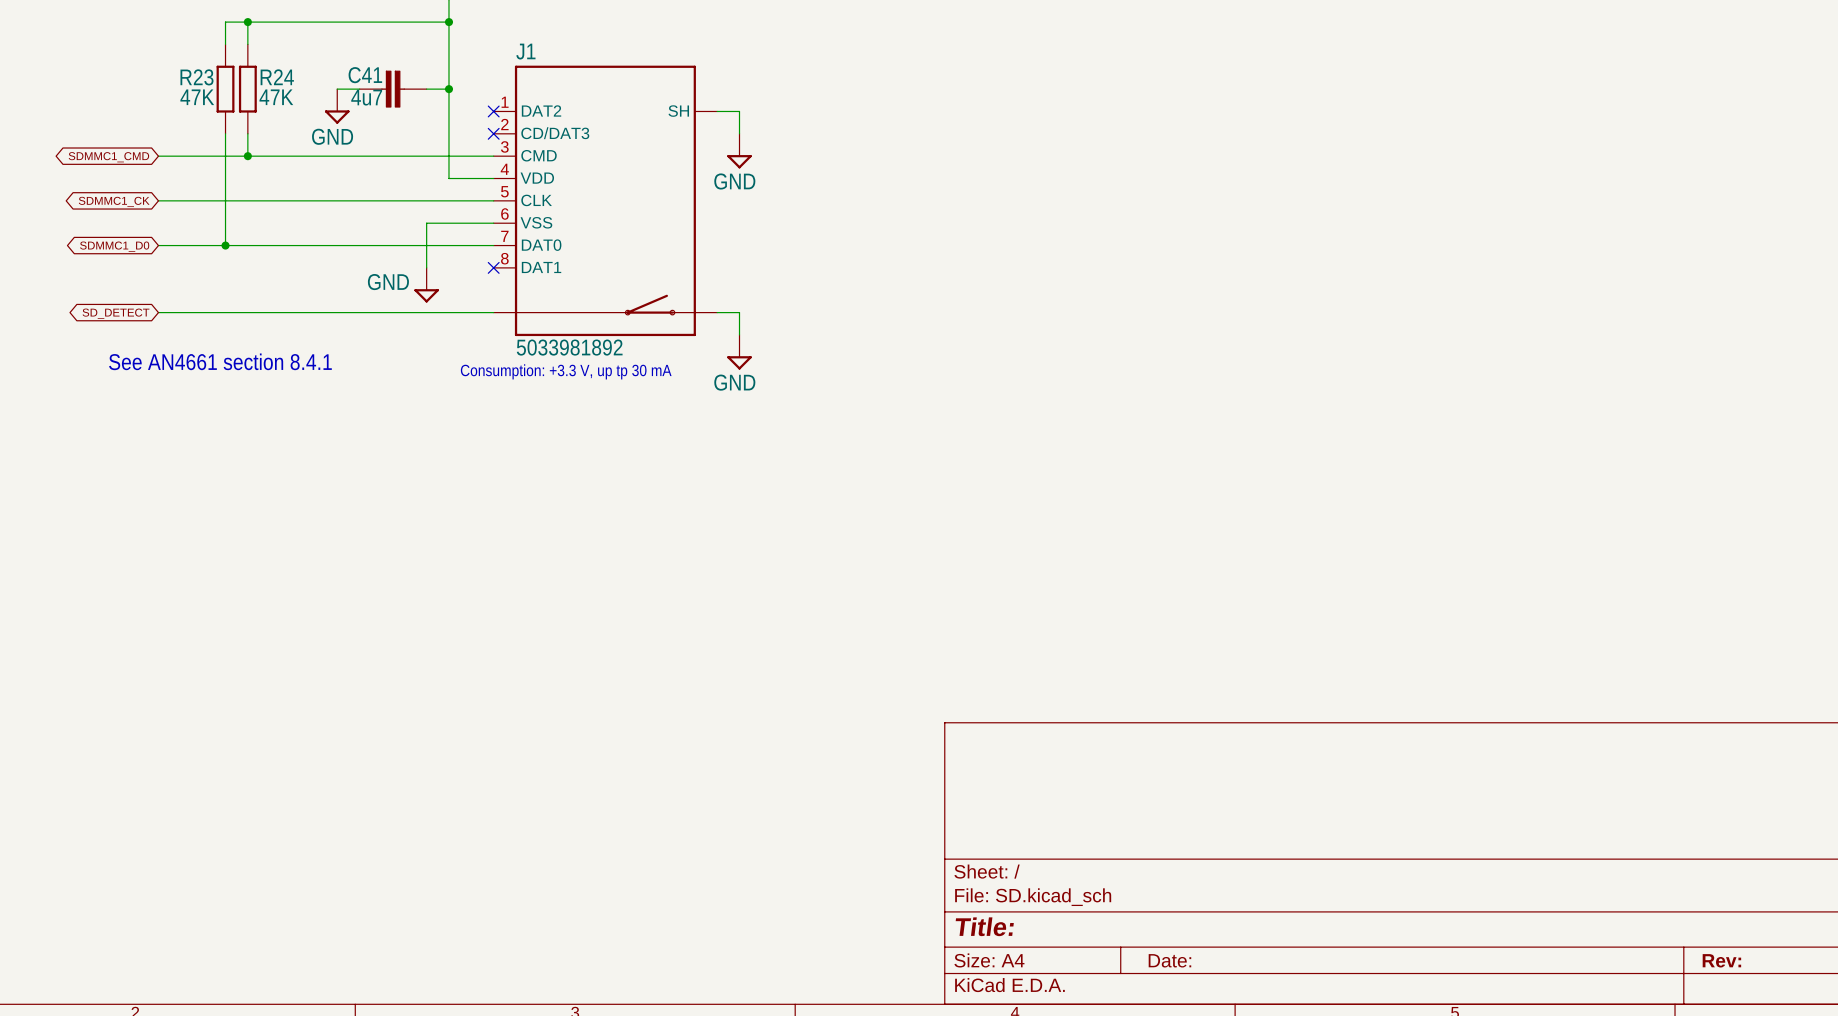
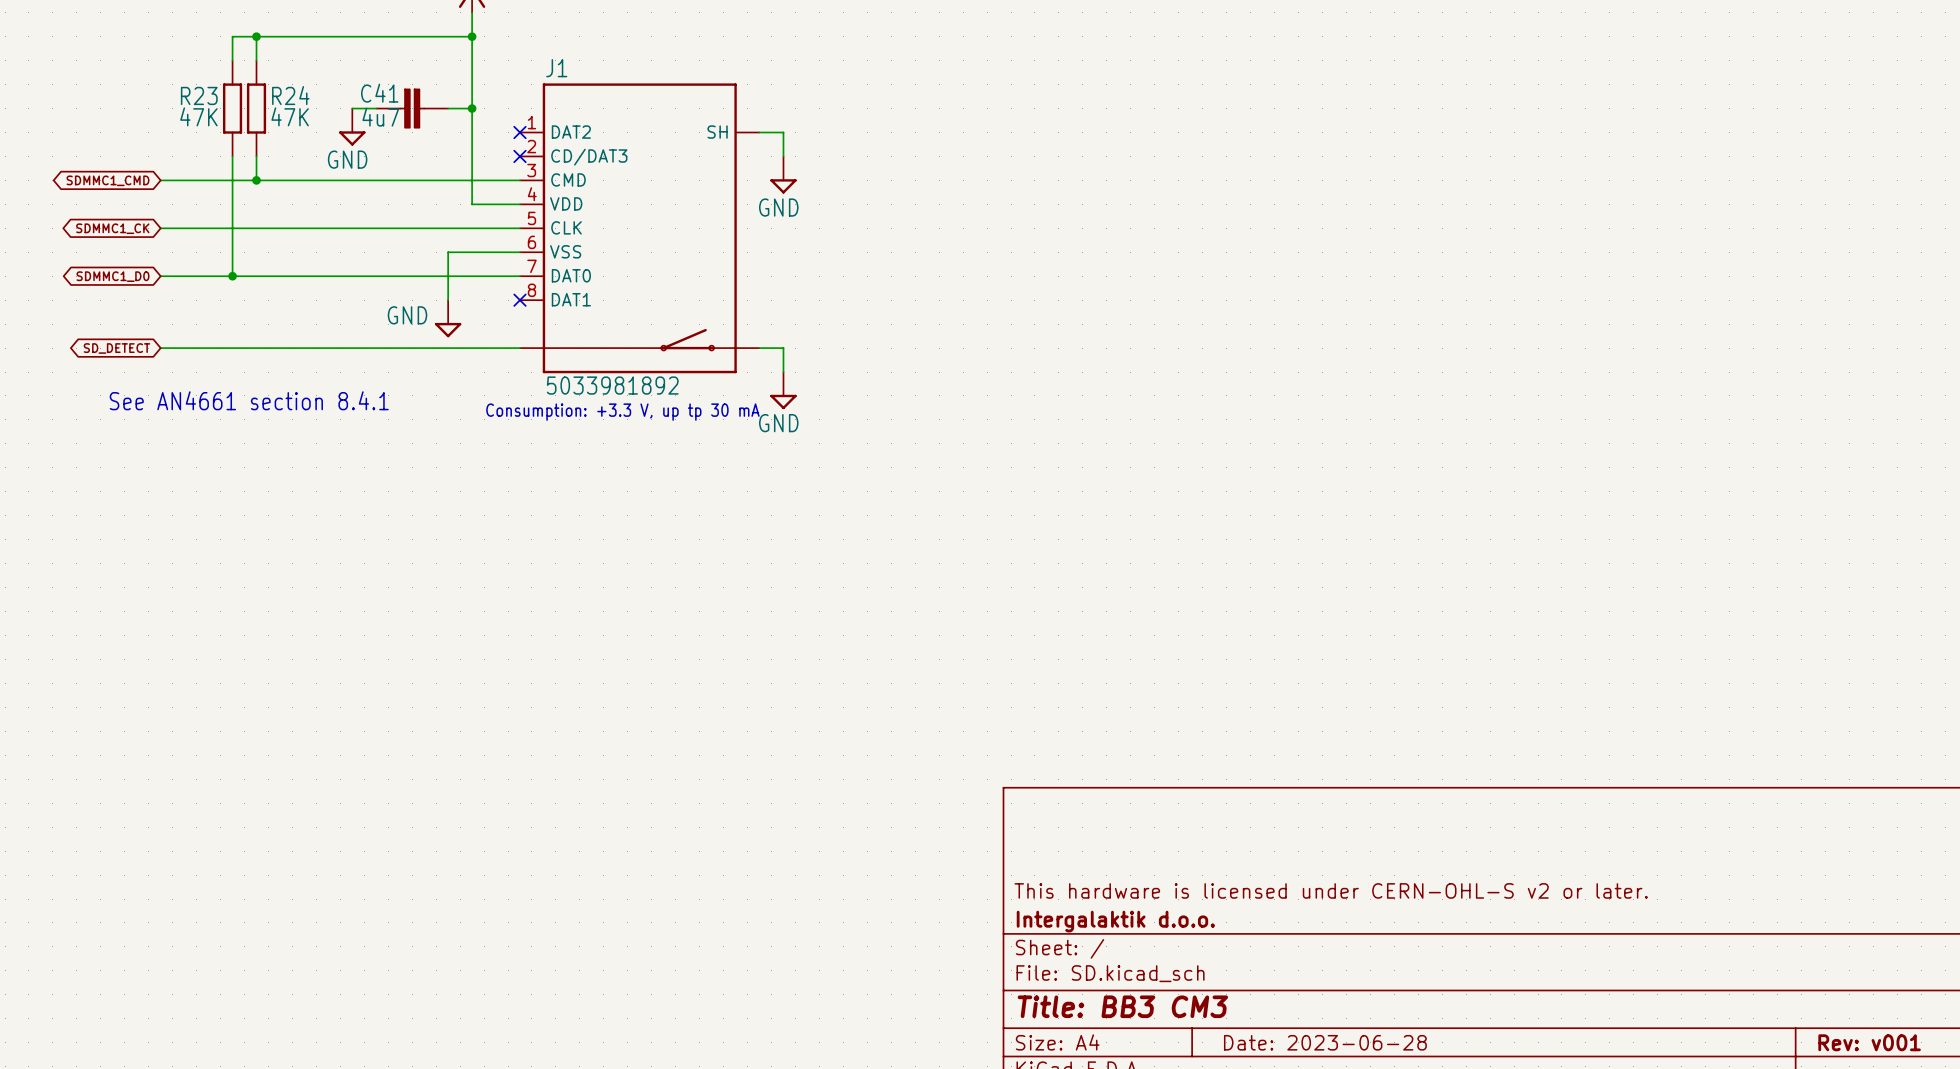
title block: none -> This hardware is licensed under CERN-OHL-S v2 or later. (1331, 890)
title block: none -> Intergalaktik d.o.o. (1115, 921)
title block: Title: (984, 926) -> Title: BB3 CM3 (1122, 1006)
title block: Date: (1169, 960) -> Date: 2023-06-28 (1325, 1042)
title block: Rev: (1721, 960) -> Rev: v001 (1869, 1042)

